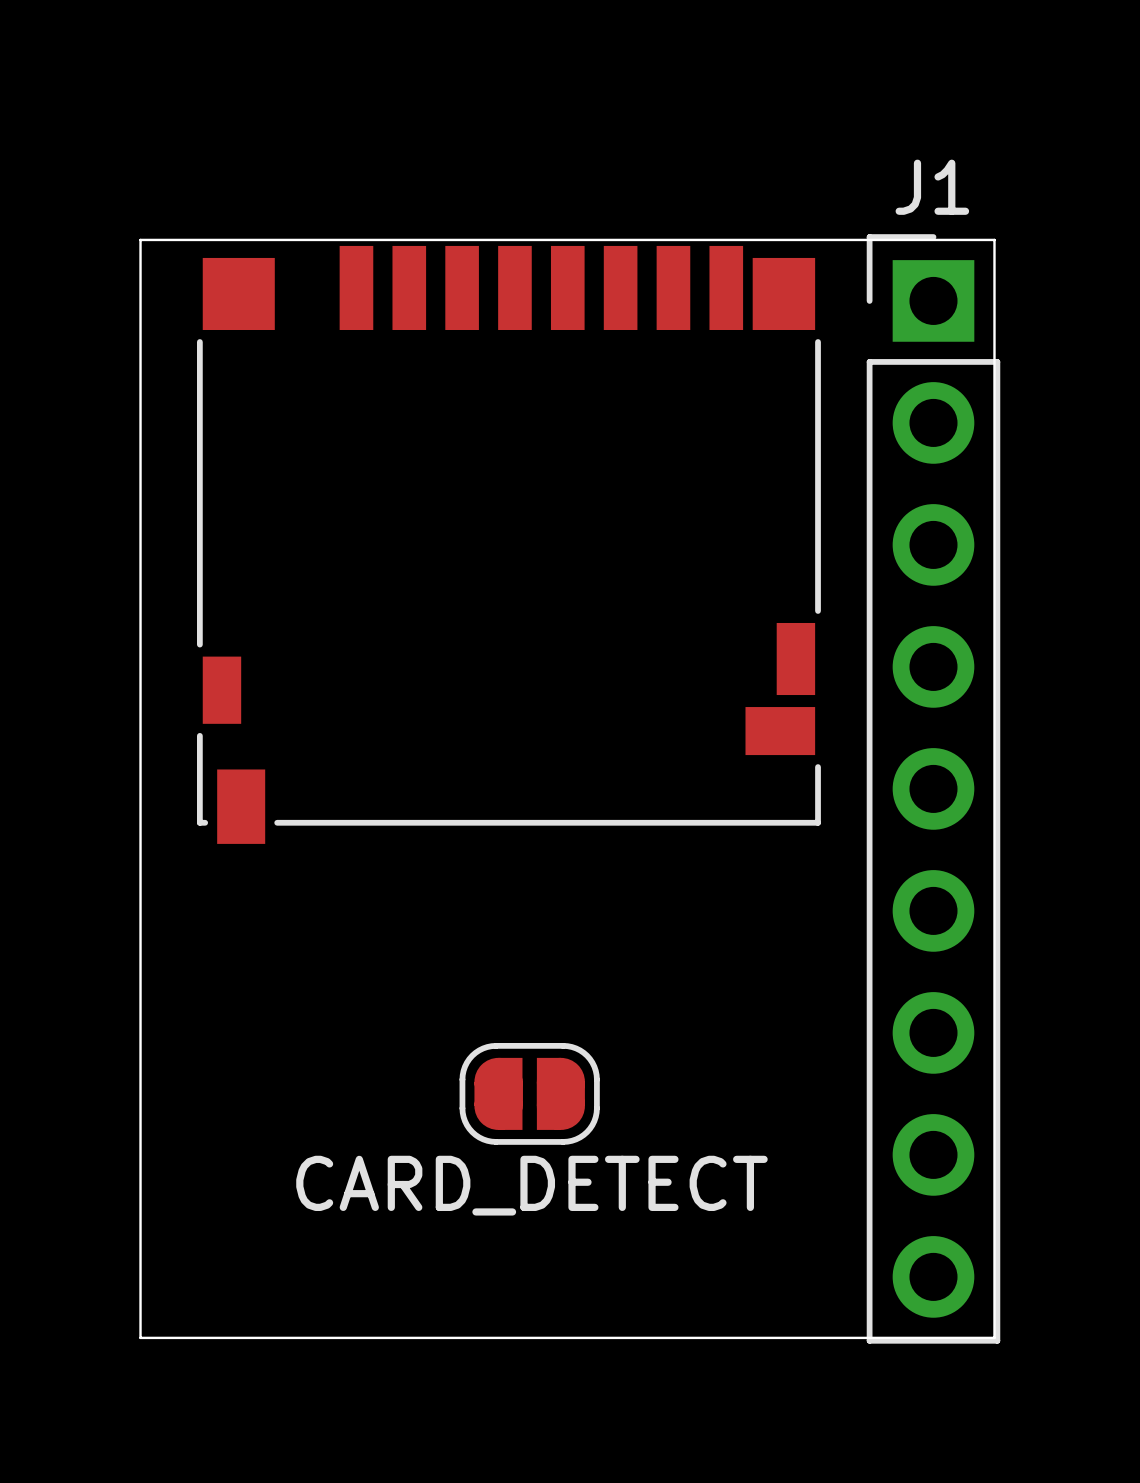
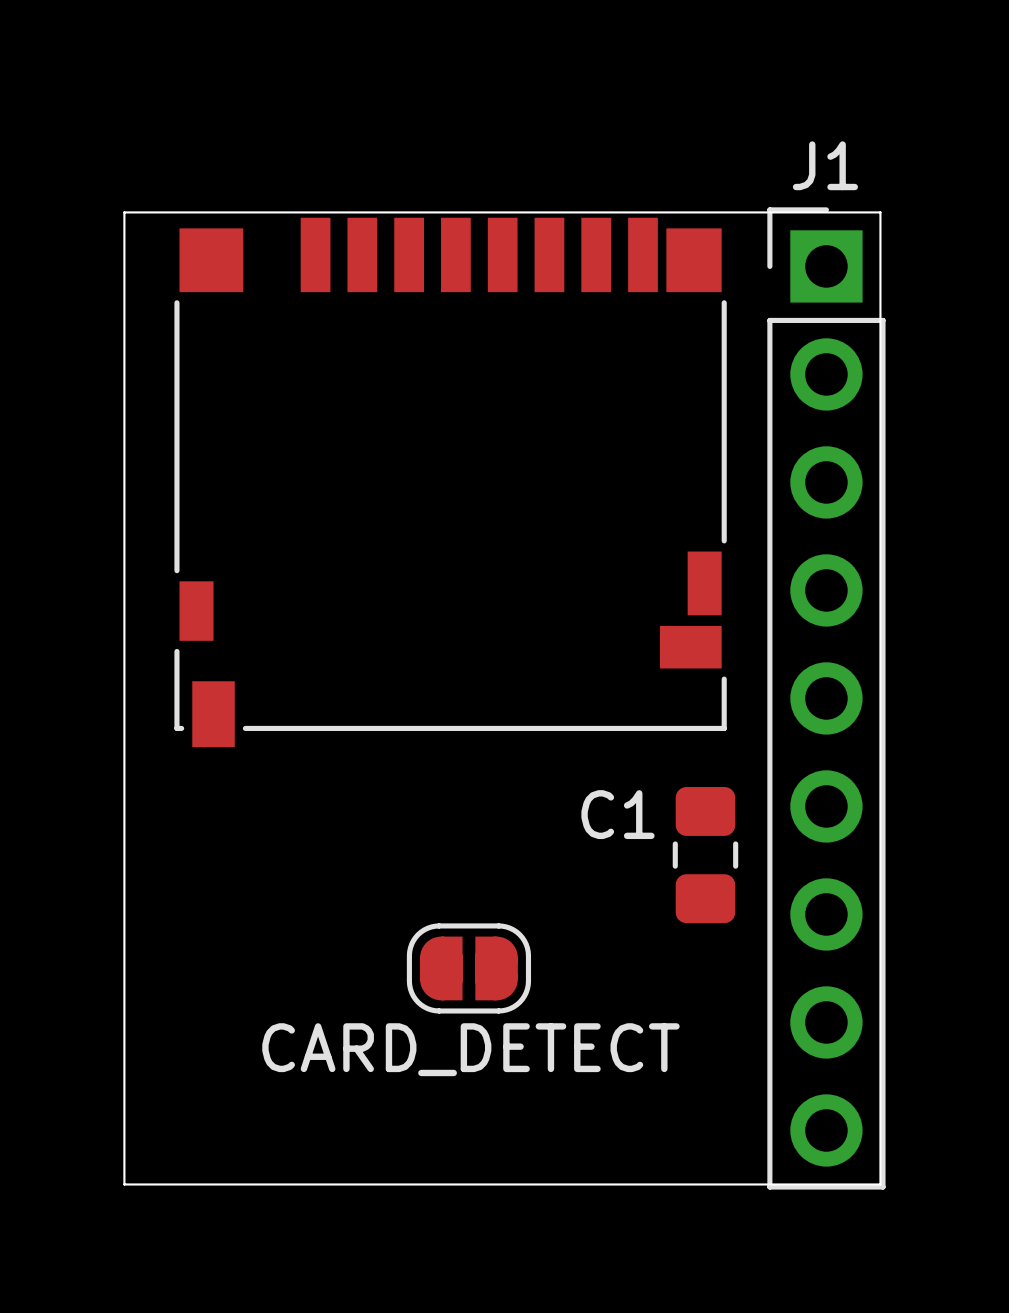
C1: none -> (705, 855)

